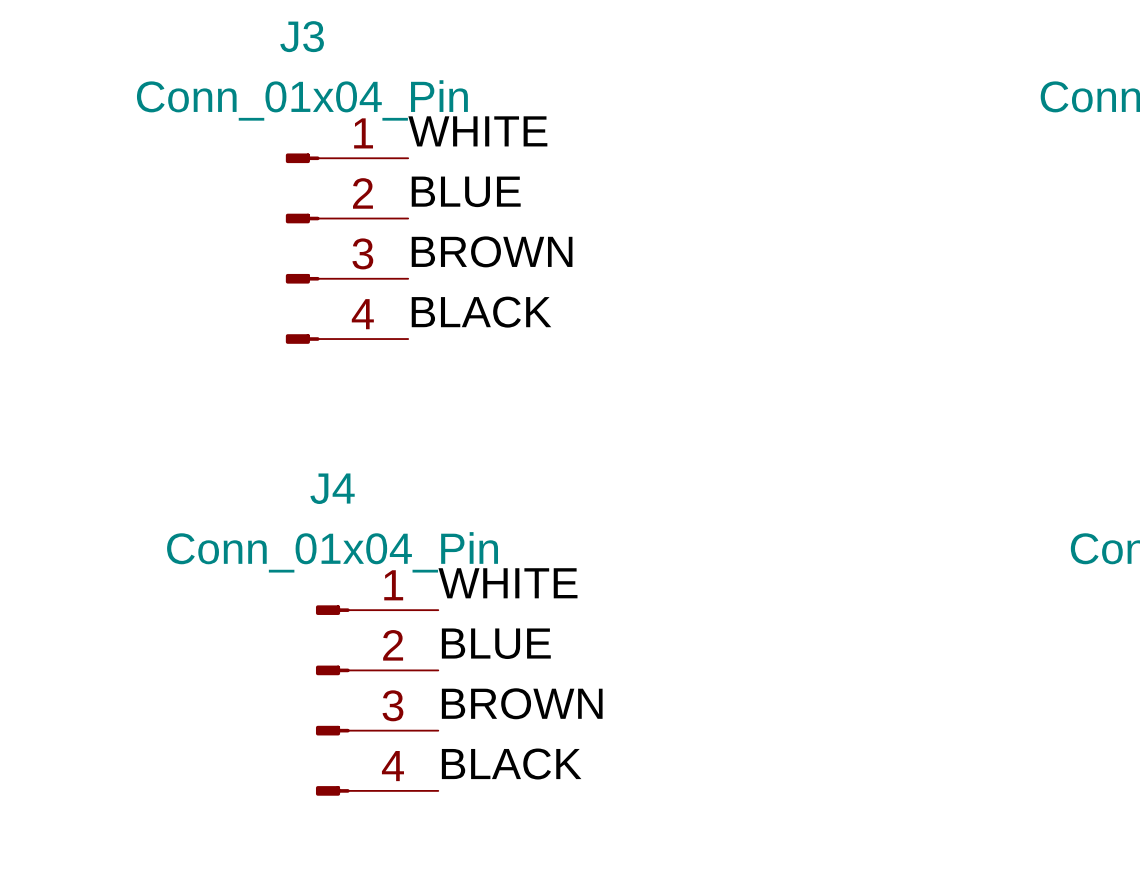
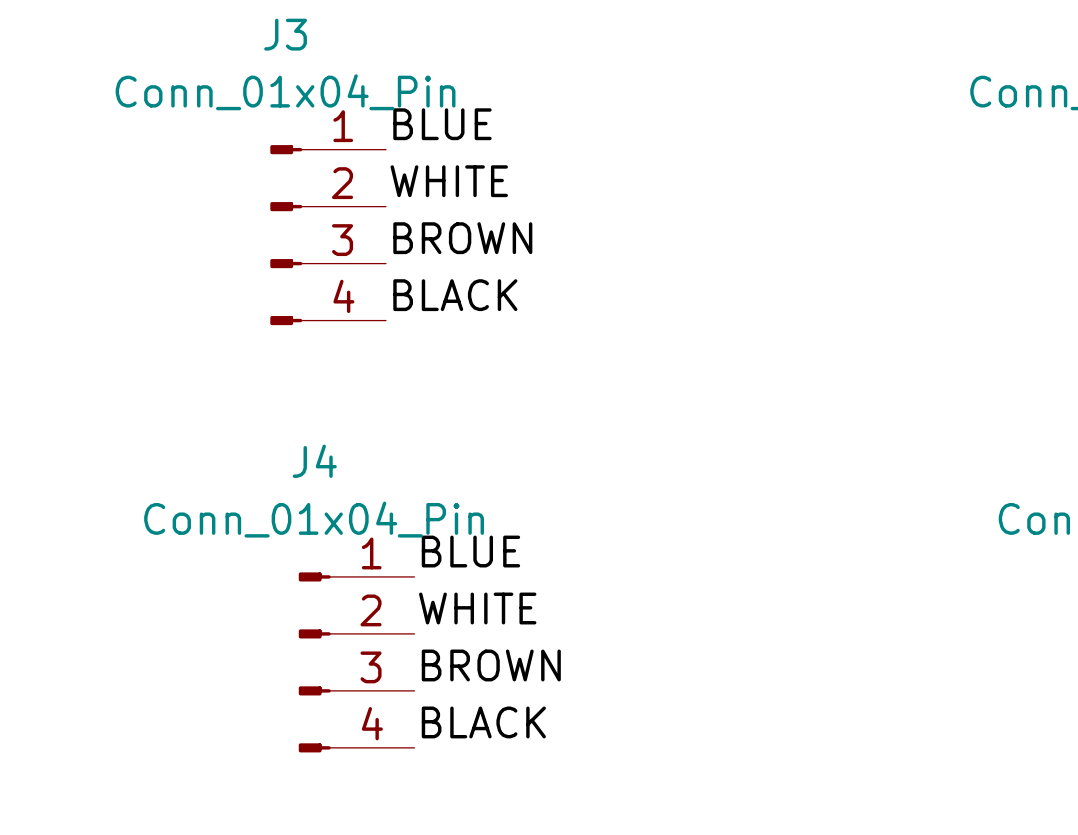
label: WHITE (477, 131) -> BLUE (442, 124)
label: BLUE (466, 191) -> WHITE (449, 181)
label: WHITE (507, 583) -> BLUE (470, 551)
label: BLUE (496, 643) -> WHITE (477, 608)

